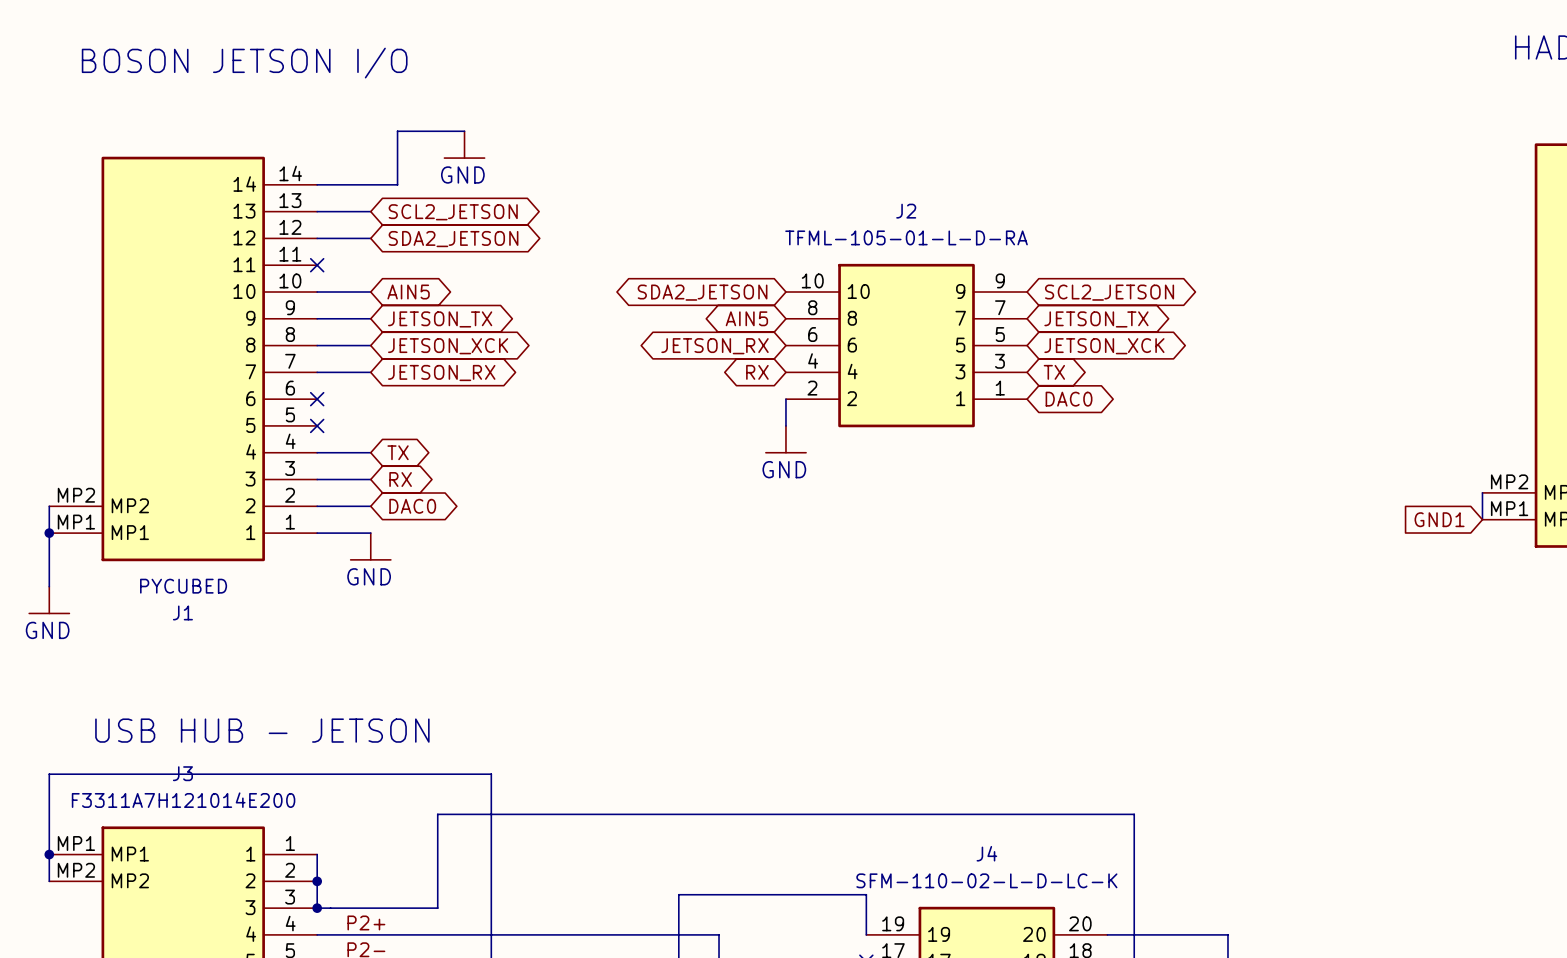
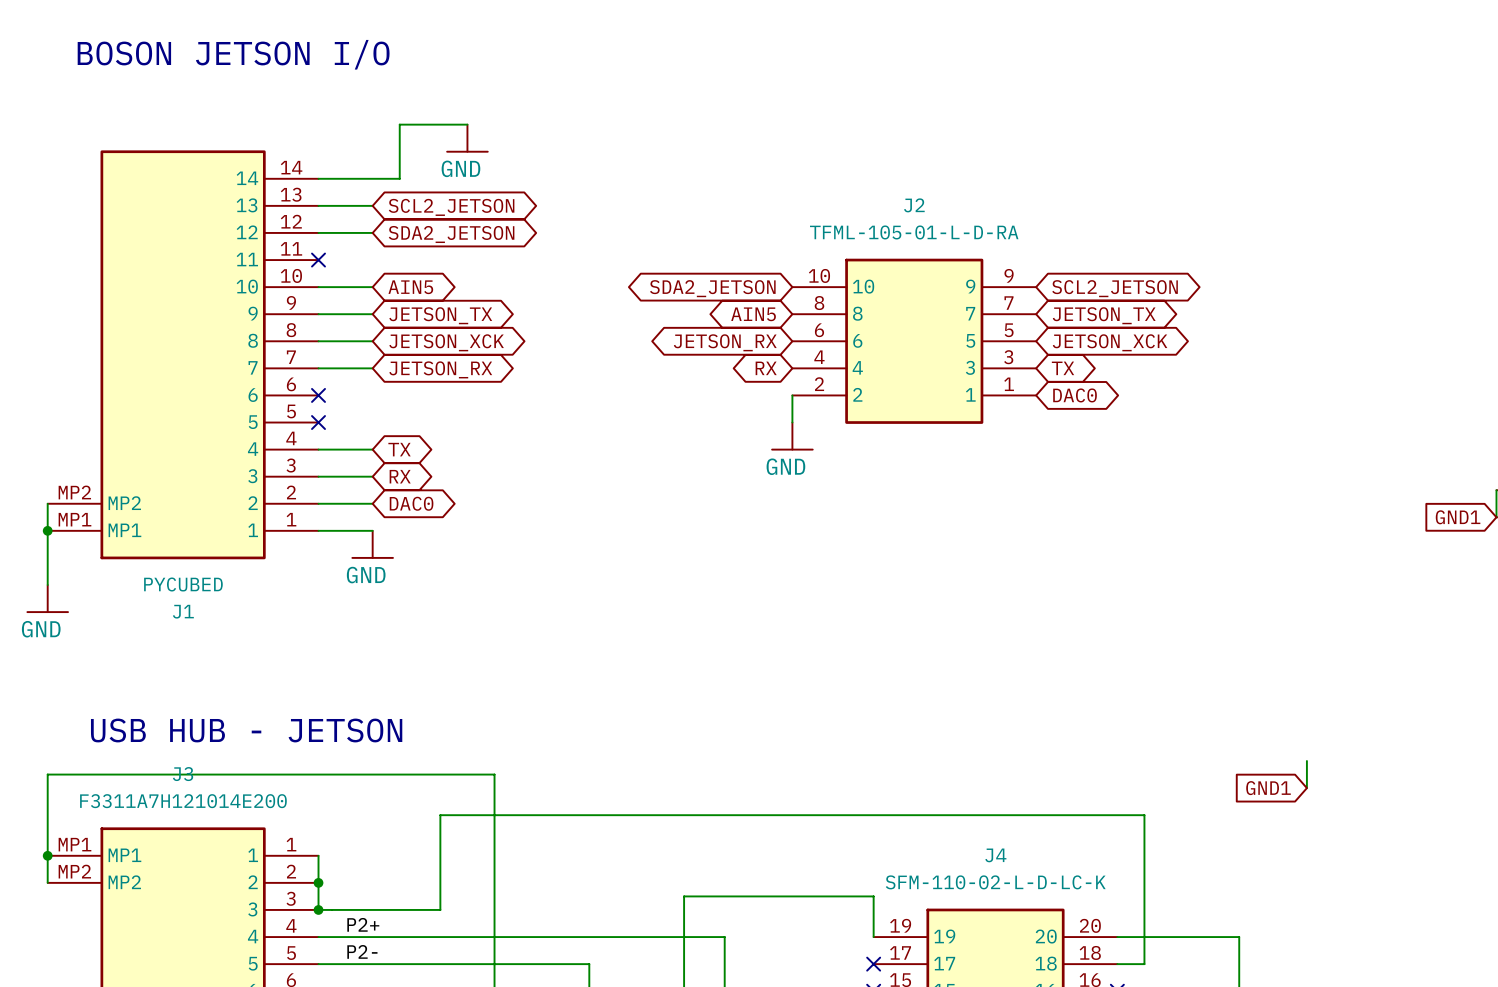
wire: none -> (1306, 761) (1306, 788)
global label: none -> GND1 (1268, 788)

